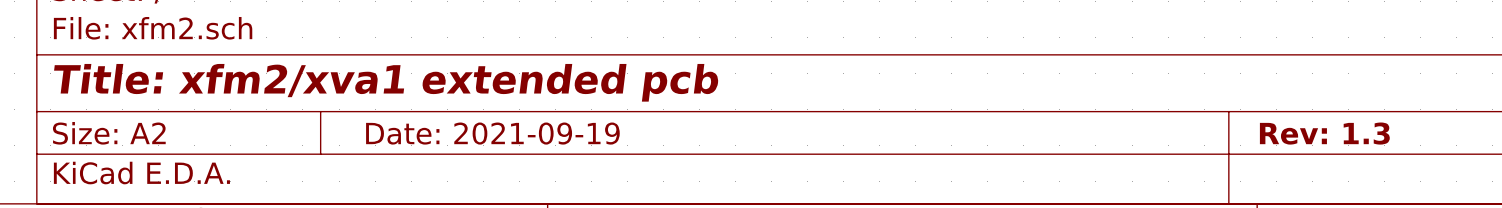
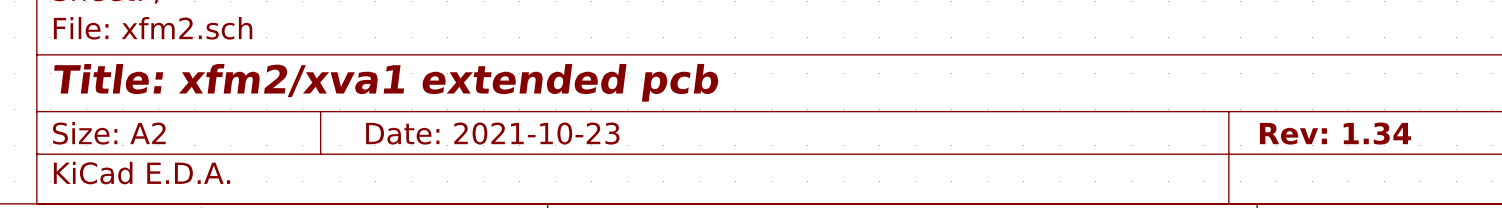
title block: Date: 2021-09-19 (492, 133) -> Date: 2021-10-23 (492, 133)
title block: Rev: 1.3 (1324, 133) -> Rev: 1.34 (1335, 133)

